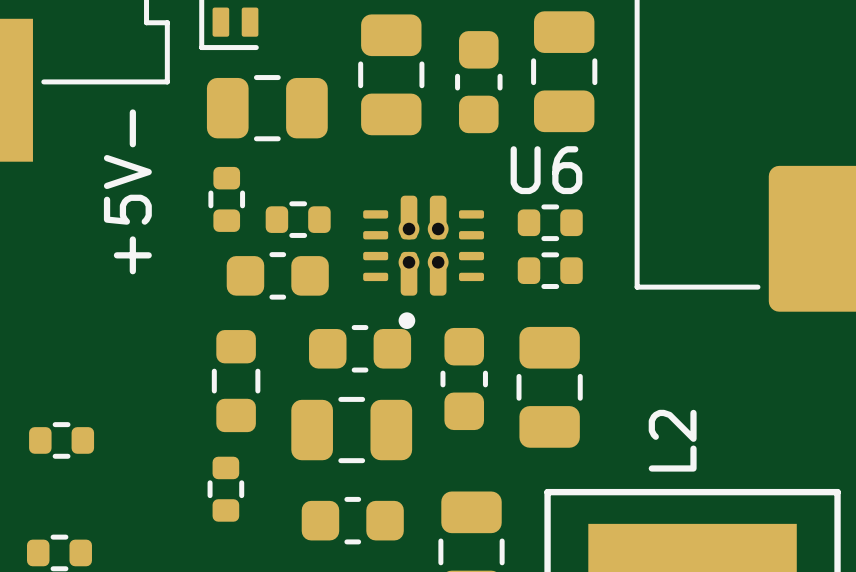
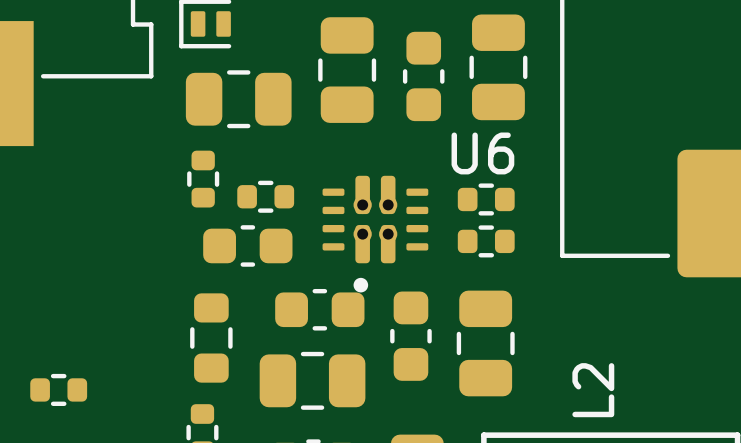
text: +5V- (127, 191) -> none

